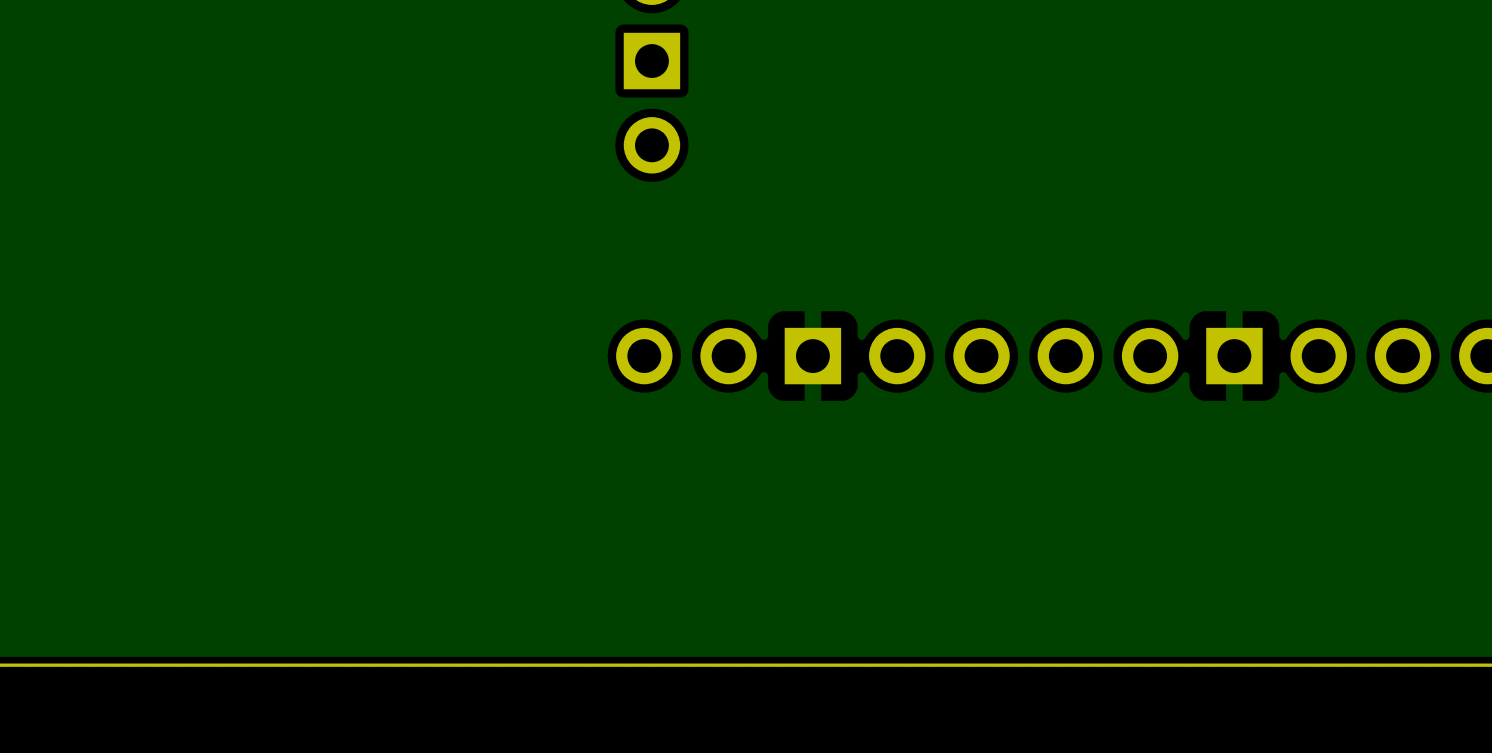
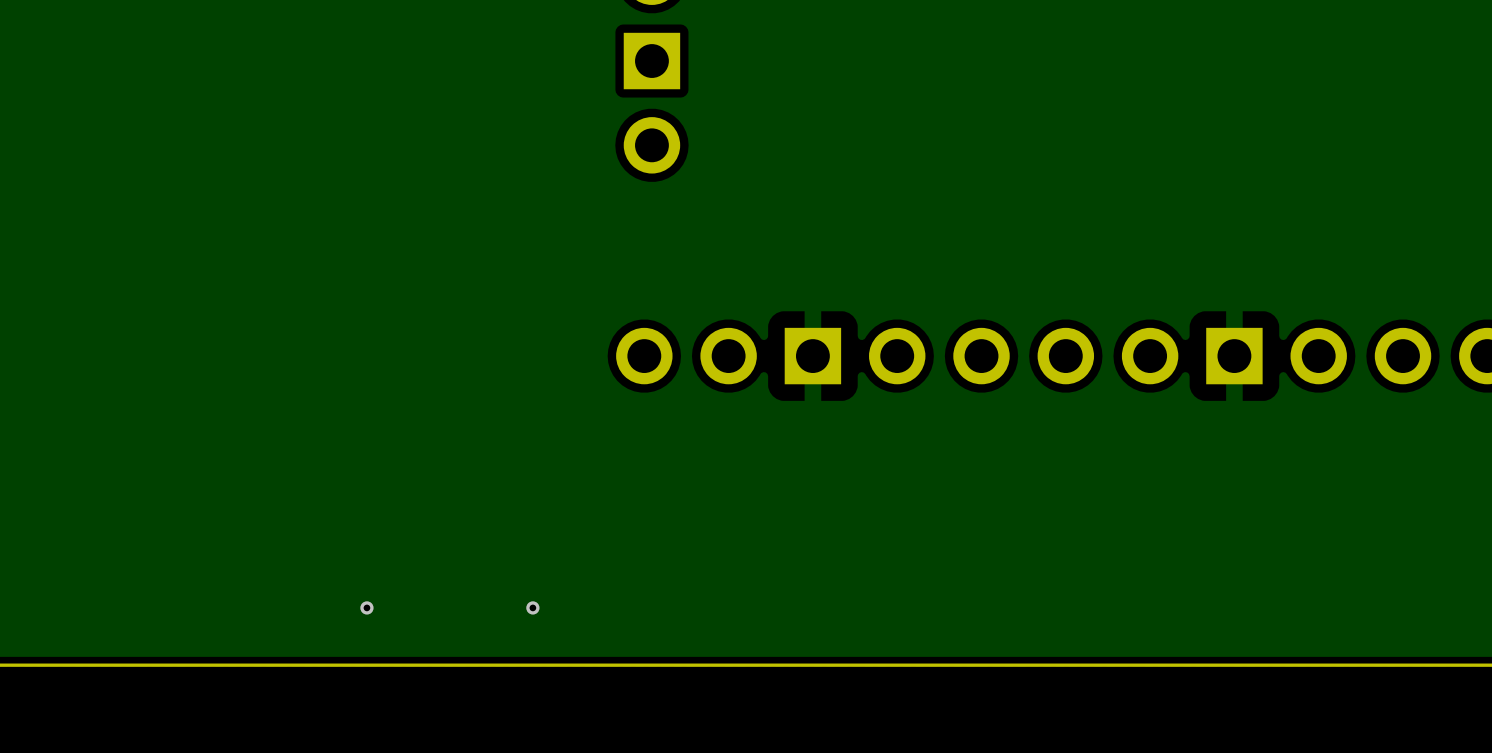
via: none -> (366, 607)
via: none -> (532, 607)

